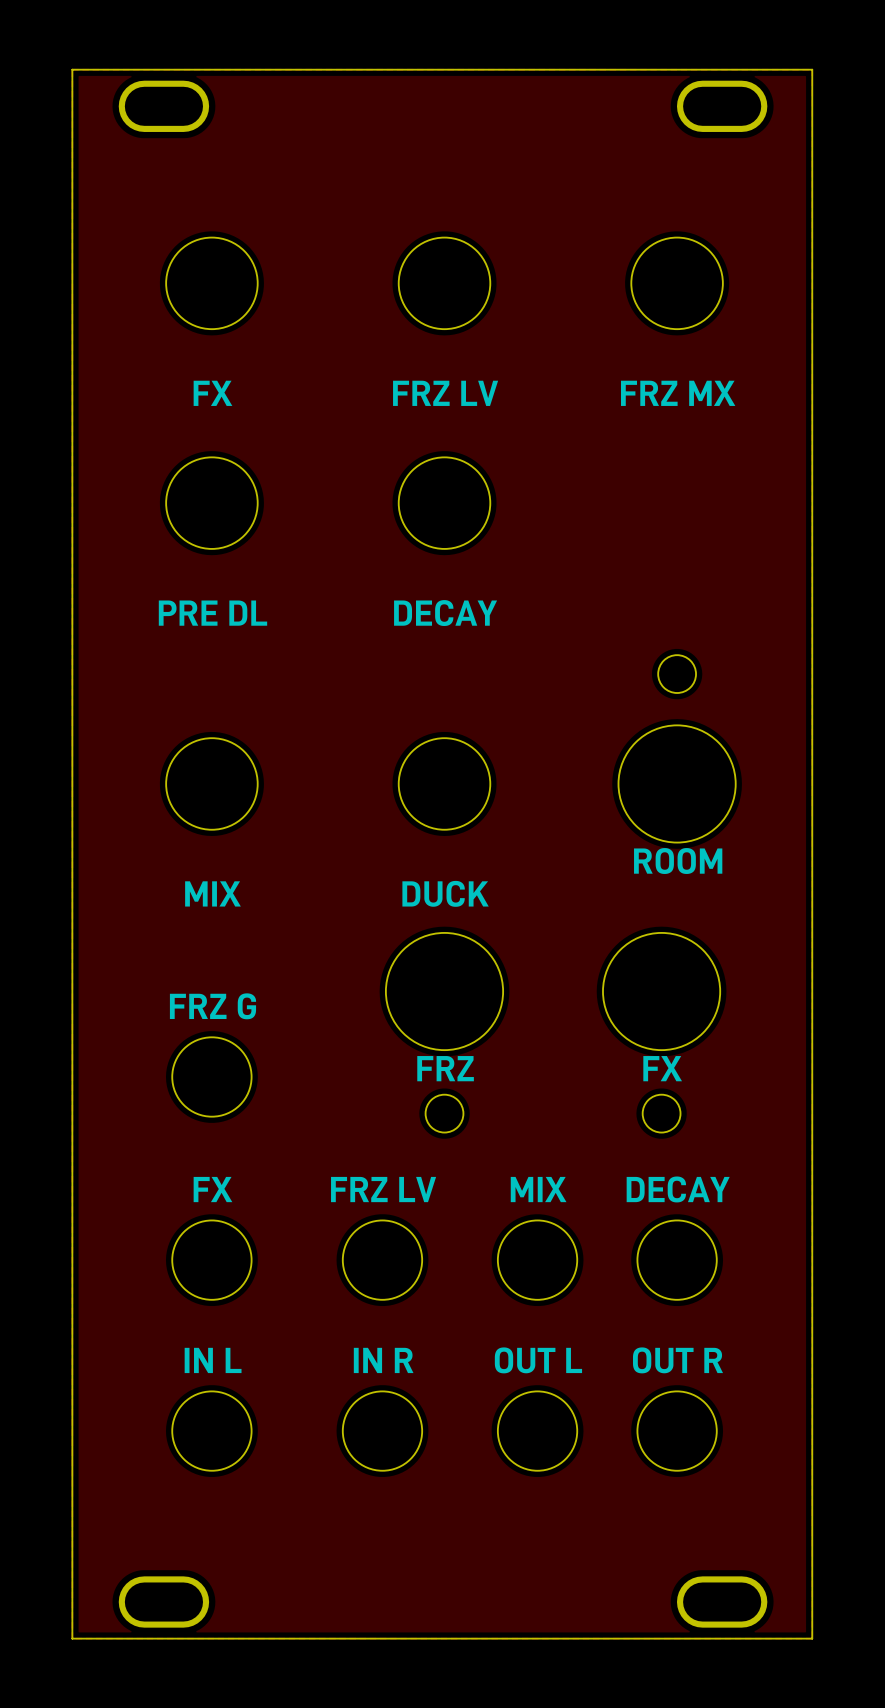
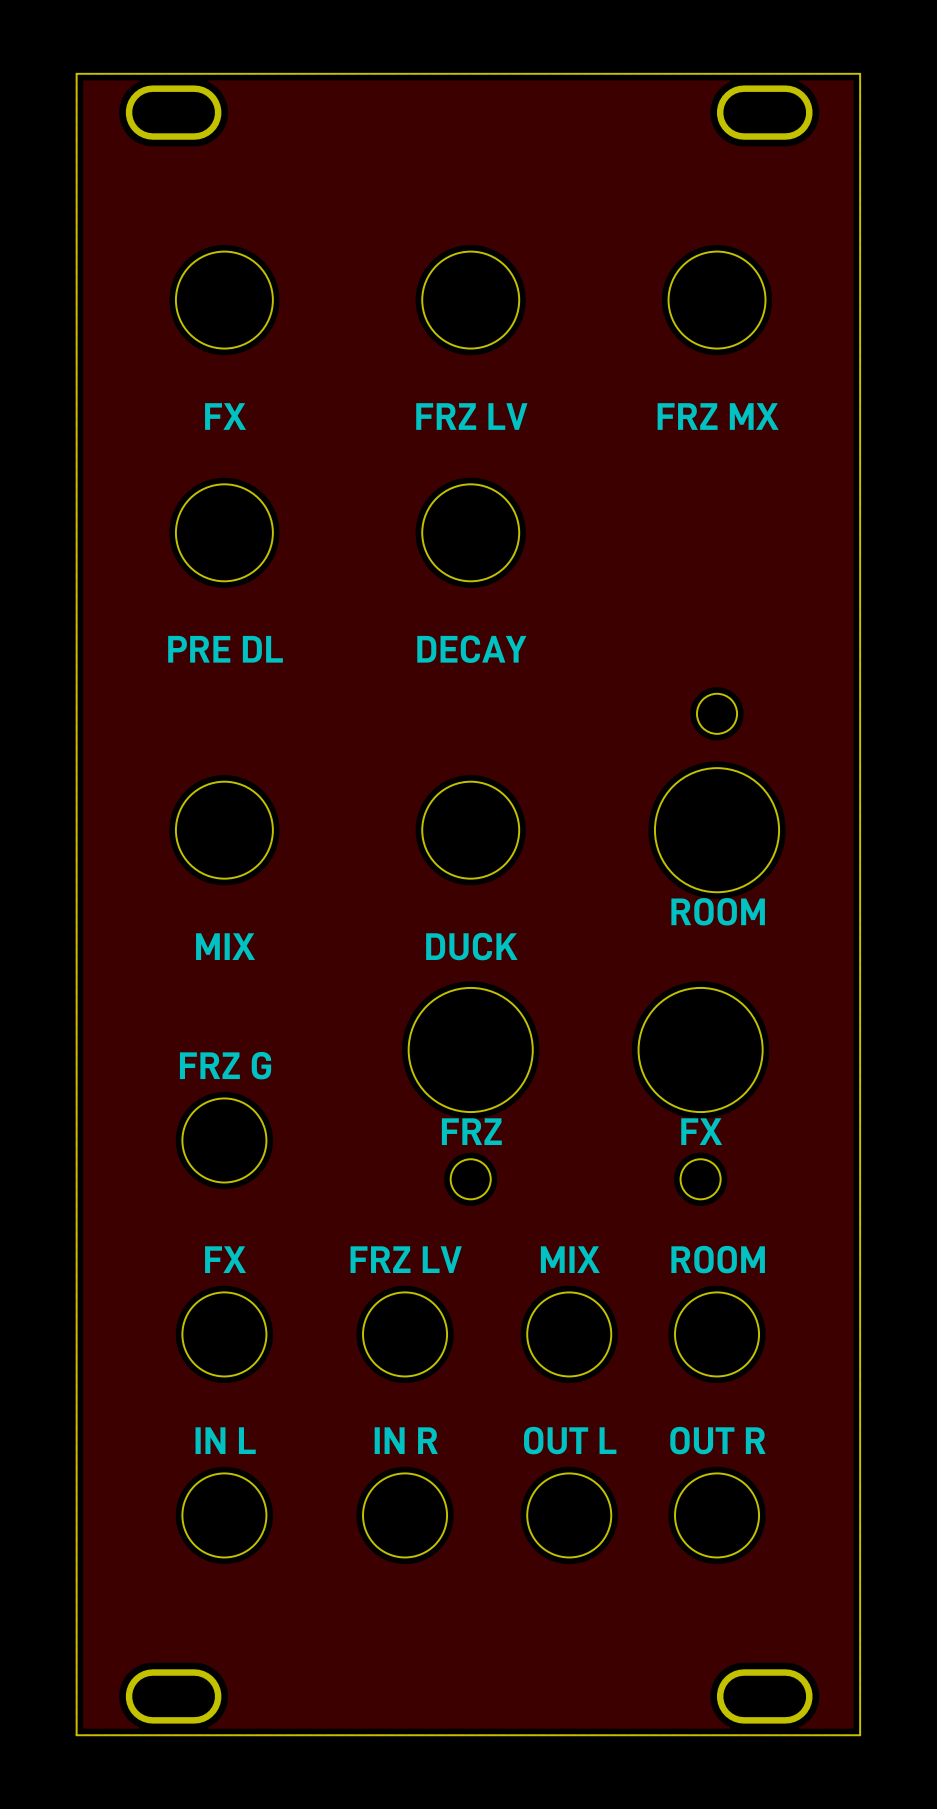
drawing shape: [158, 380, 736, 1374] -> [168, 403, 779, 1455]

